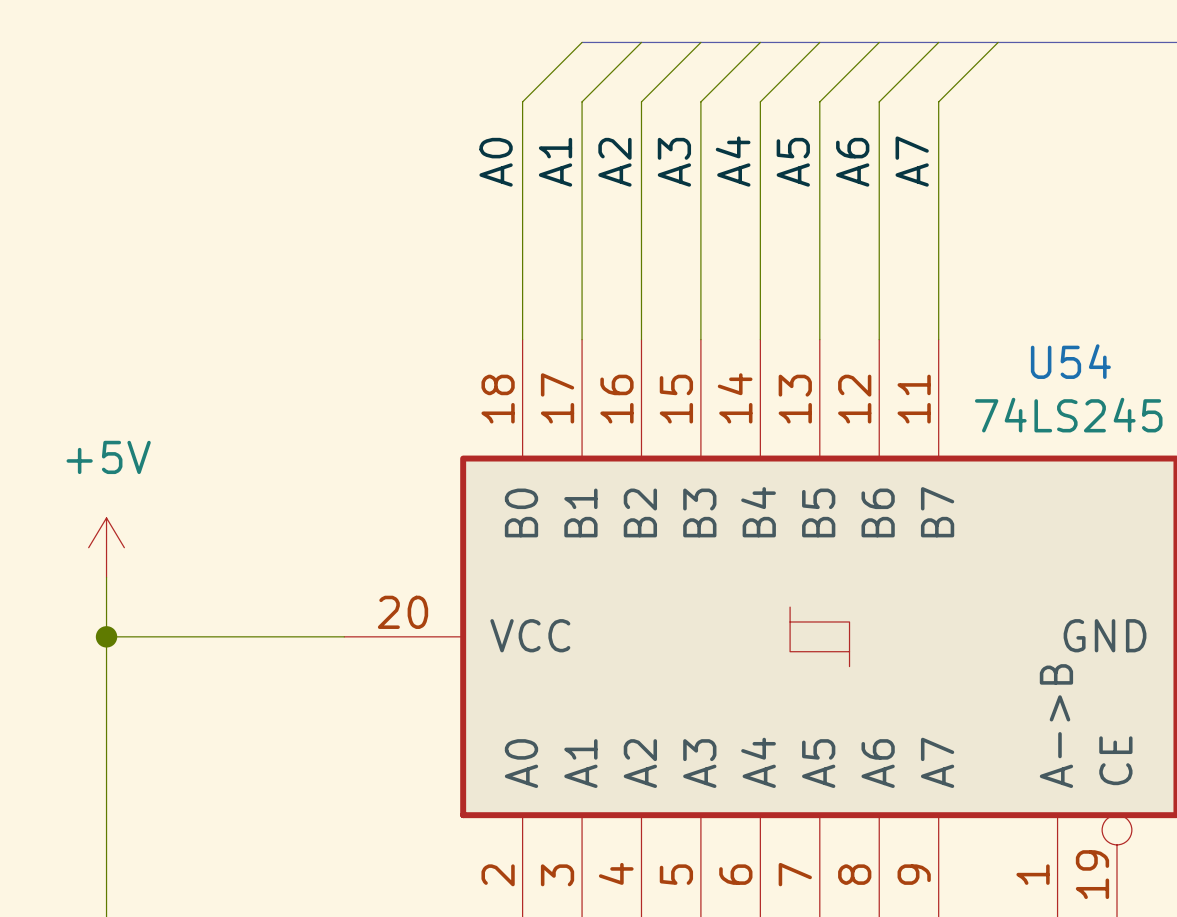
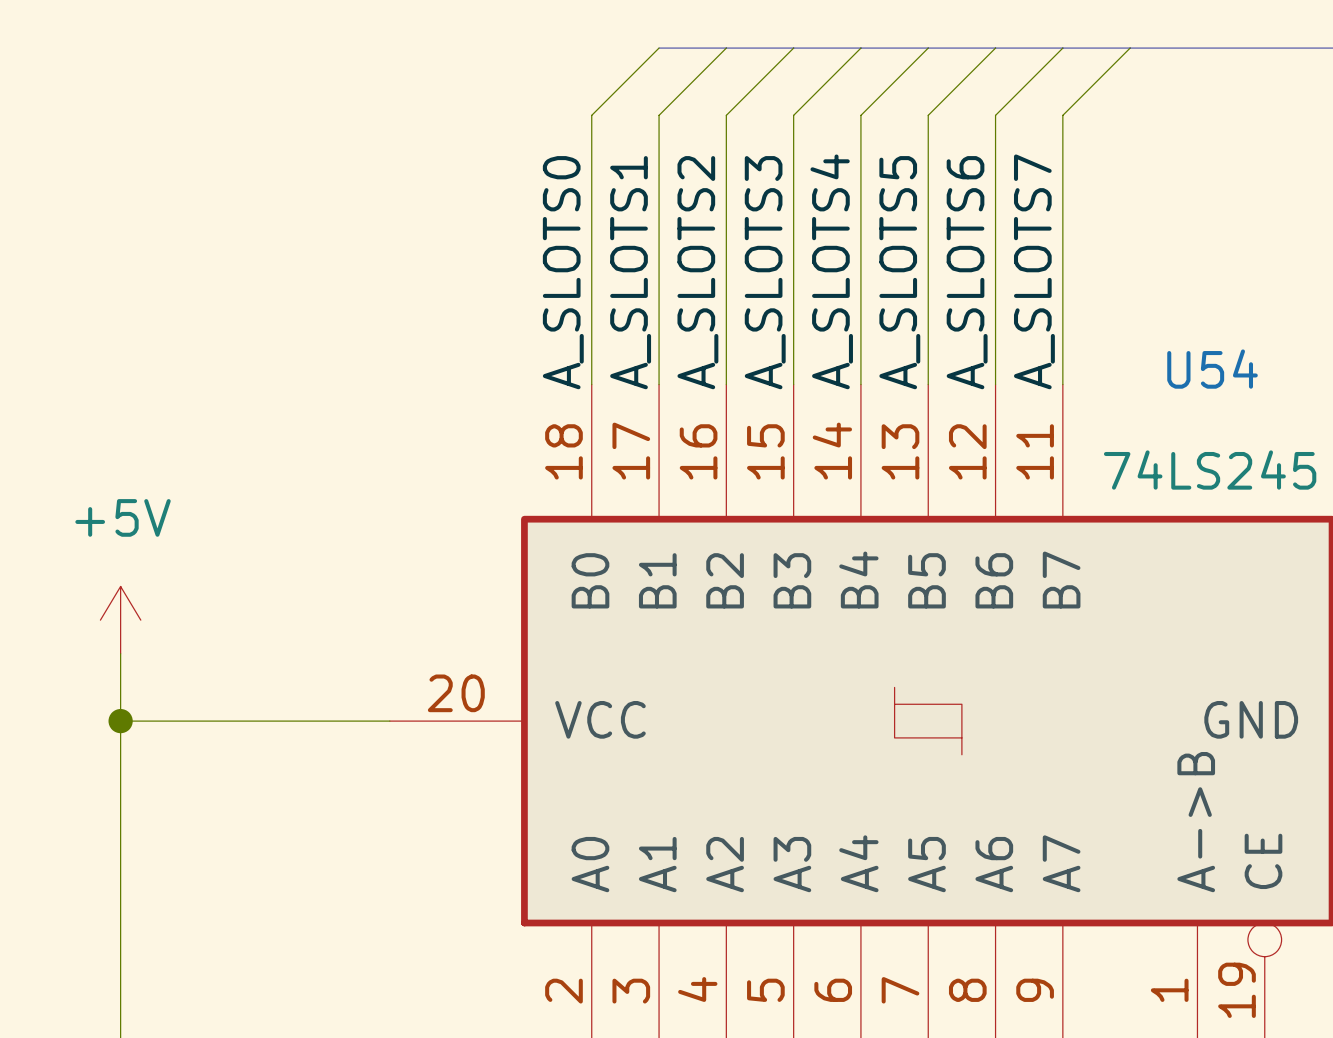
label: A4 (733, 161) -> A_SLOTS4 (831, 271)
label: A7 (912, 161) -> A_SLOTS7 (1034, 271)
label: A0 (496, 162) -> A_SLOTS0 (563, 272)
label: A1 (555, 162) -> A_SLOTS1 (630, 272)
label: A2 (614, 162) -> A_SLOTS2 (697, 272)
label: A3 (674, 162) -> A_SLOTS3 (765, 272)
label: A5 (793, 162) -> A_SLOTS5 (899, 272)
label: A6 (852, 162) -> A_SLOTS6 (967, 272)
U54 name position: U54 (1070, 361) -> U54 (1212, 369)

